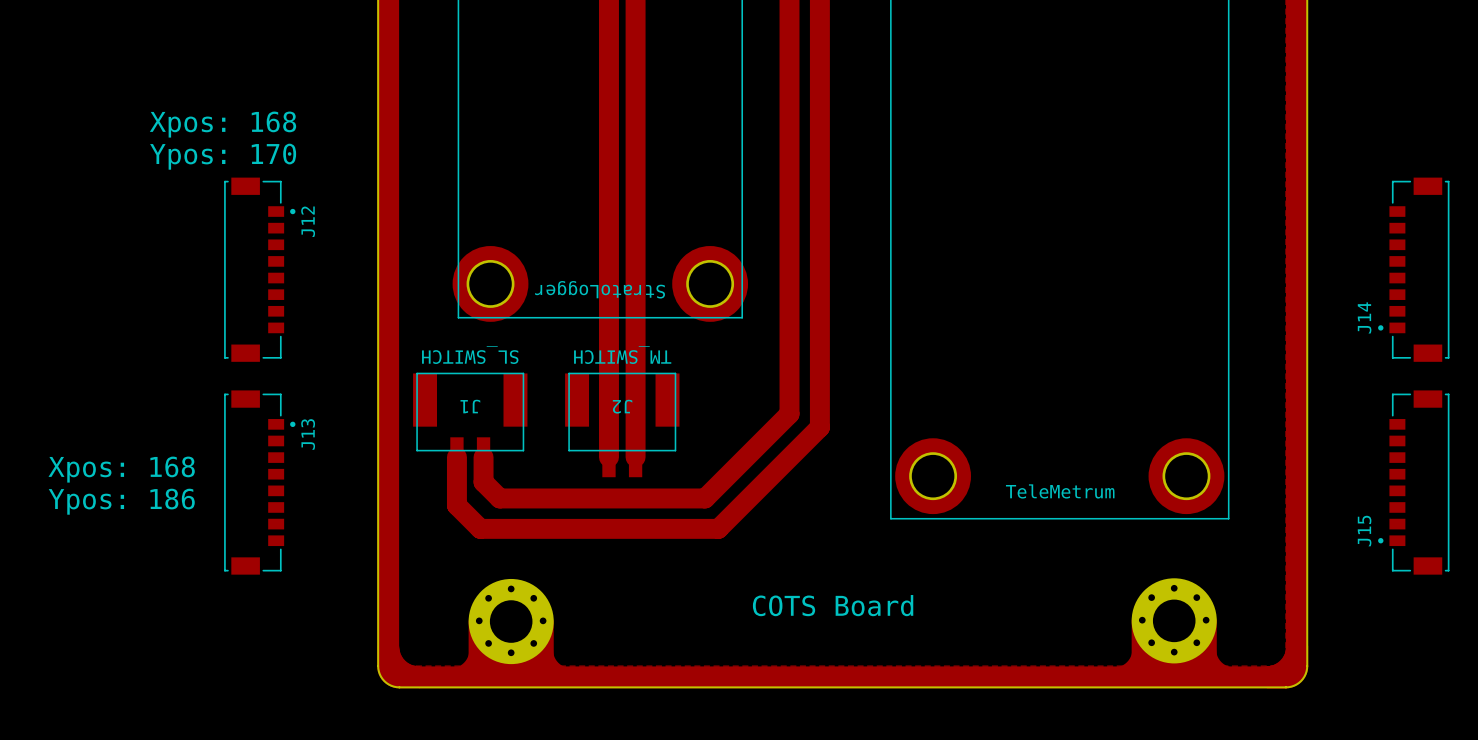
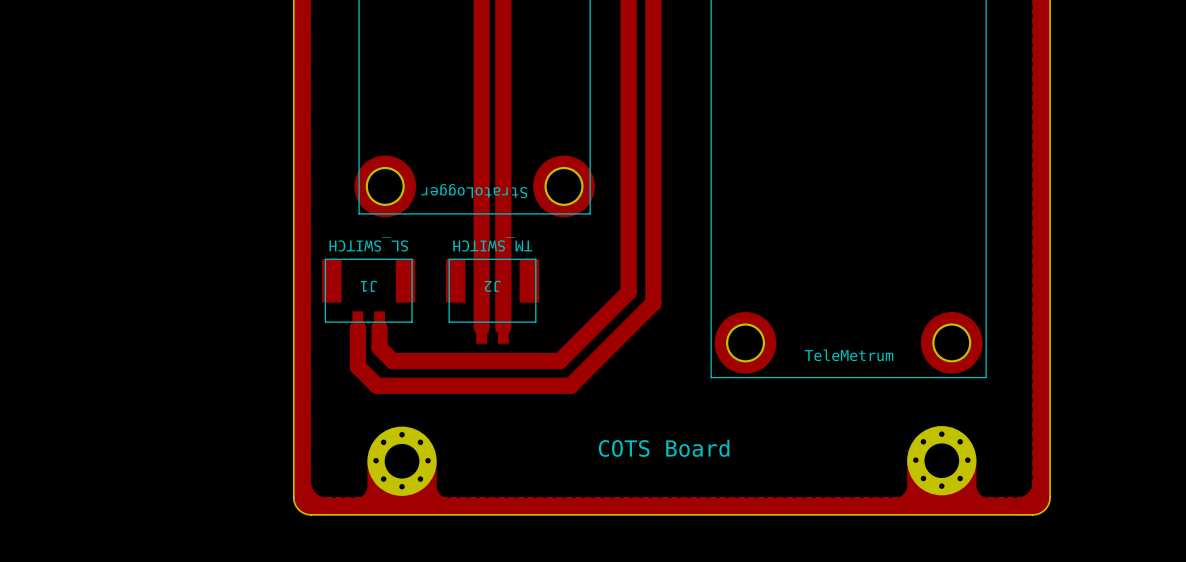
text: Xpos: 168 (222, 124) -> none
text: Ypos: 170 (223, 156) -> none
J12: (259, 269) -> none
J14: (1413, 269) -> none
text: Xpos: 168 (121, 469) -> none
J13: (259, 482) -> none
J15: (1413, 482) -> none
text: Ypos: 186 (121, 501) -> none

